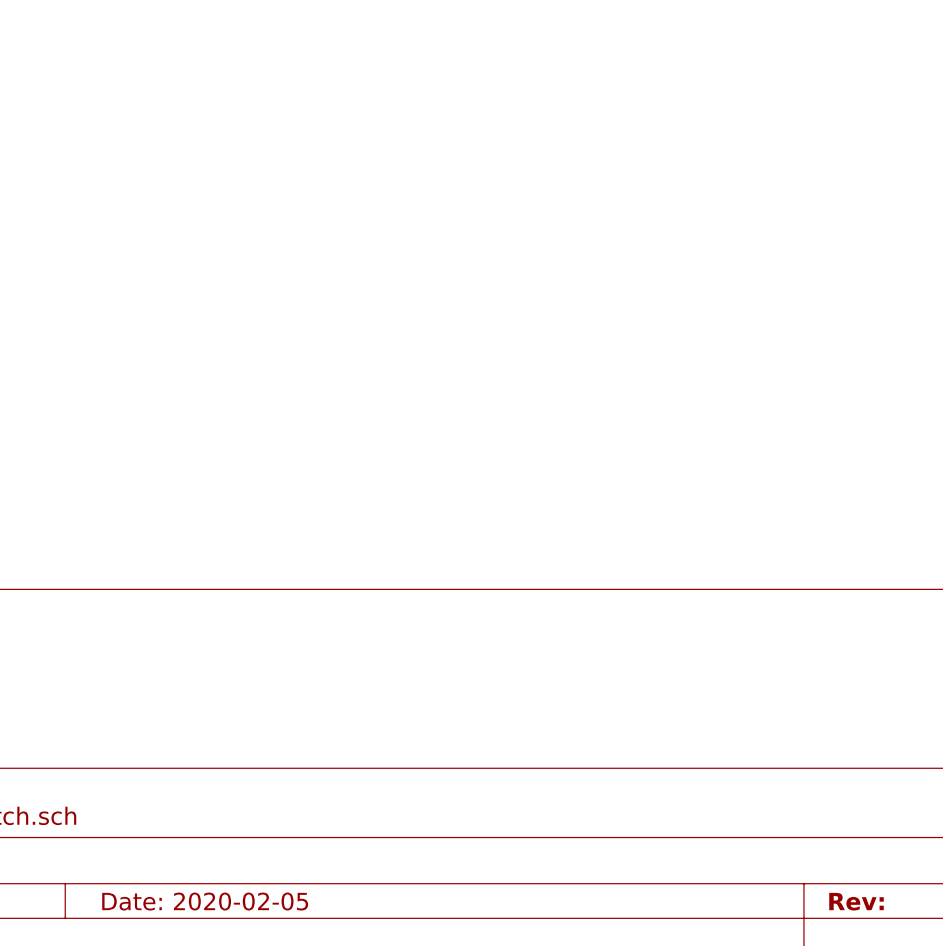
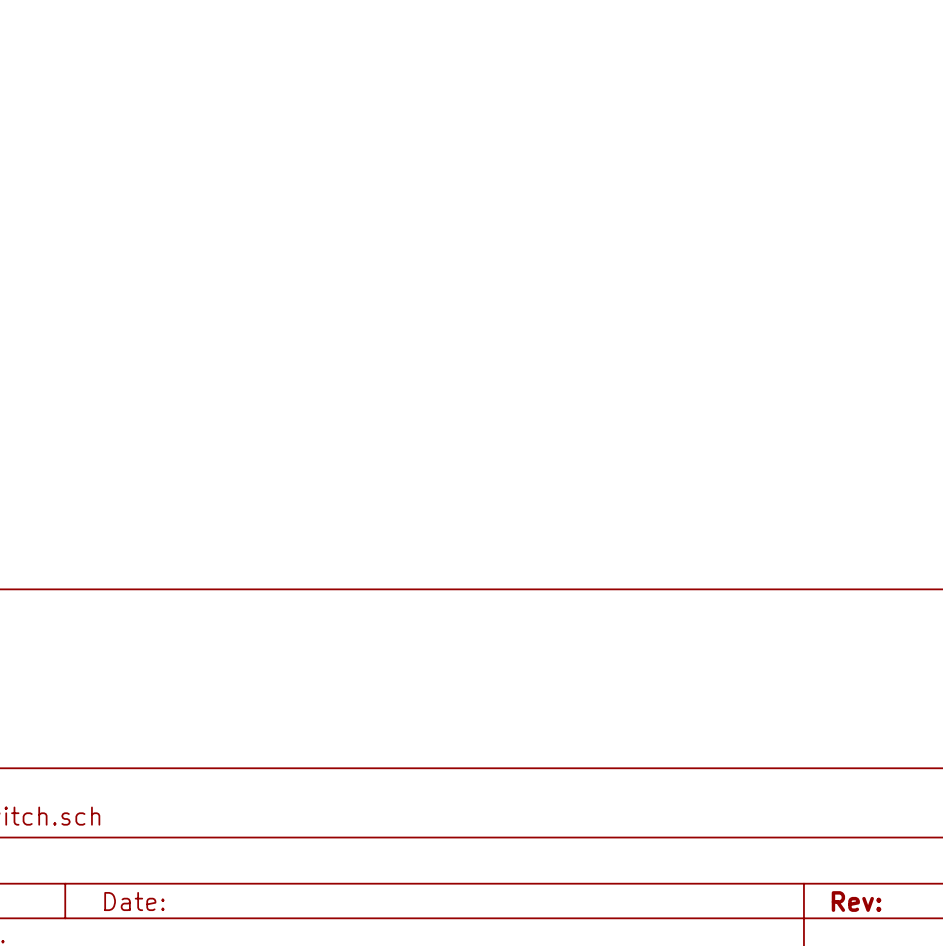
title block: Date: 2020-02-05 (205, 901) -> Date: (134, 901)

